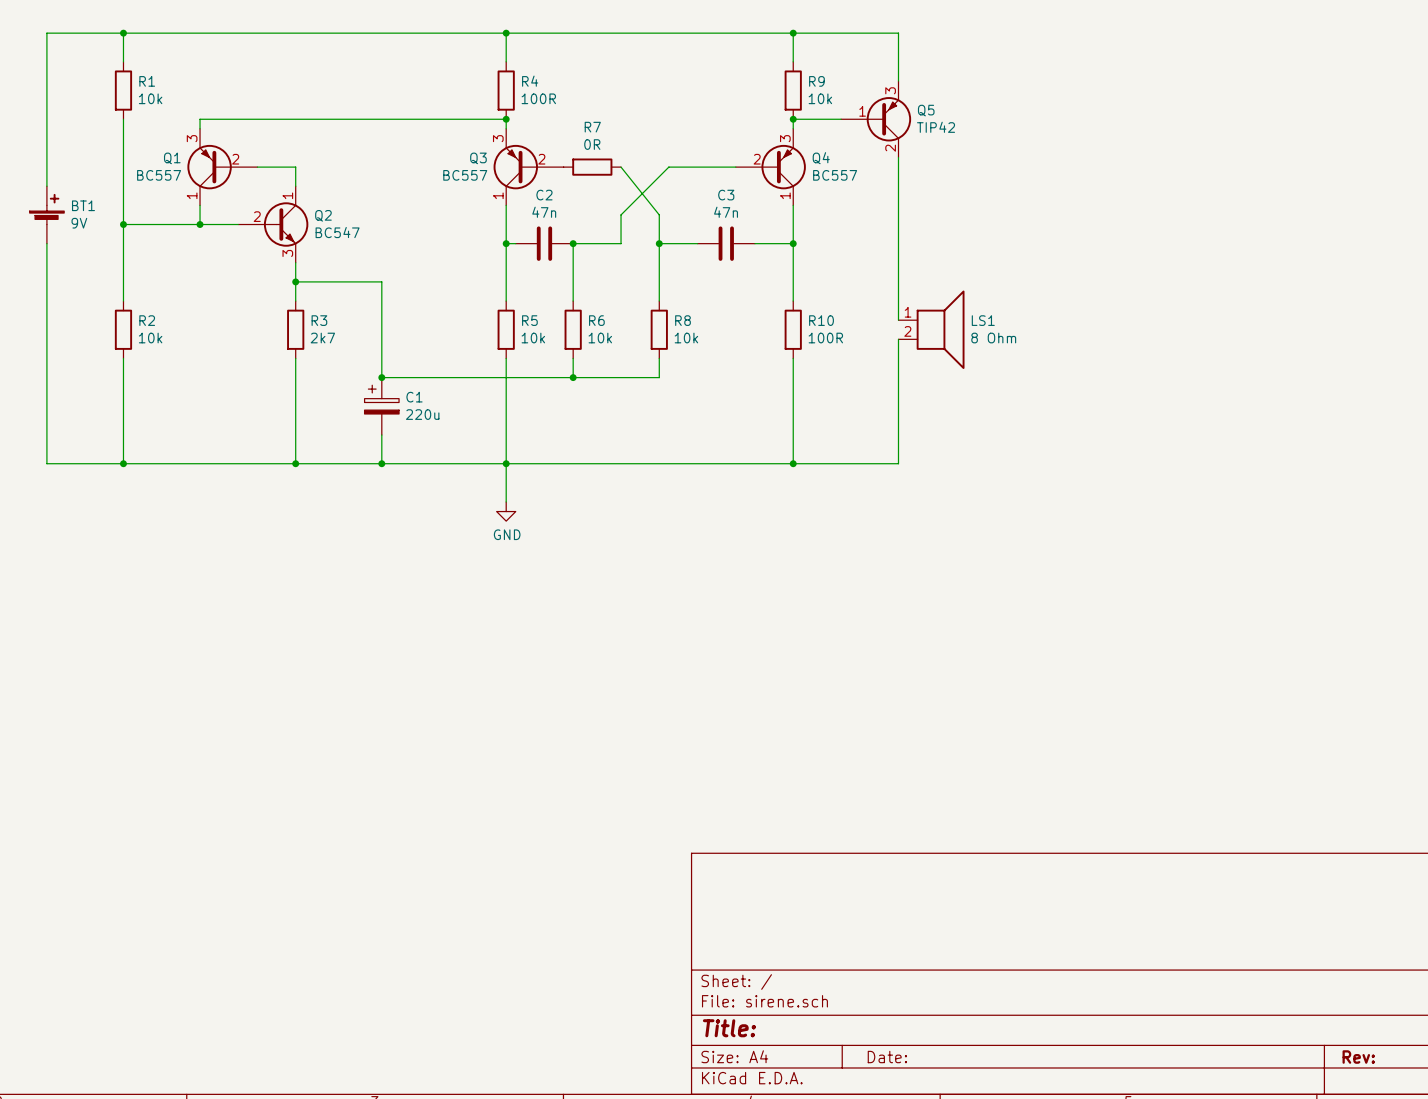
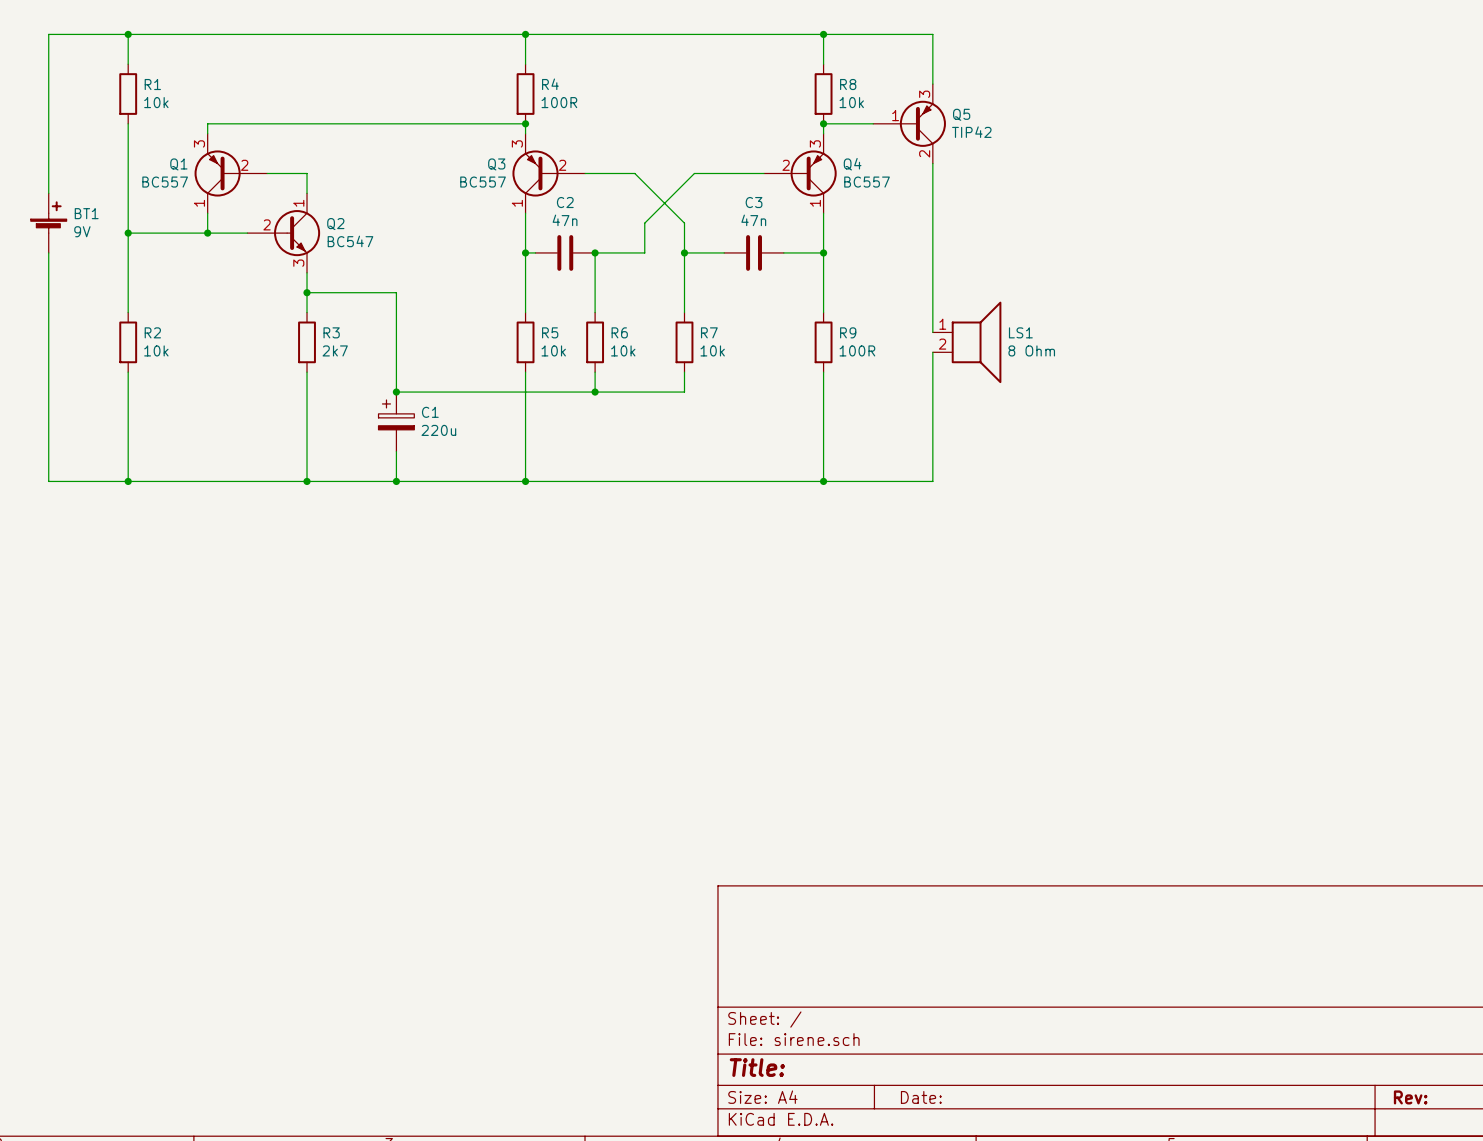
R9 name: R9 (816, 81) -> R8 (848, 84)
R7: 0R (592, 167) -> none
wire: (621, 167) (659, 214) -> (585, 173) (634, 173) (684, 223)
R8 name: R8 (683, 320) -> R7 (709, 332)
R10 name: R10 (821, 320) -> R9 (848, 332)
wire: (506, 463) (506, 501) -> none
power symbol: GND (506, 511) -> none

